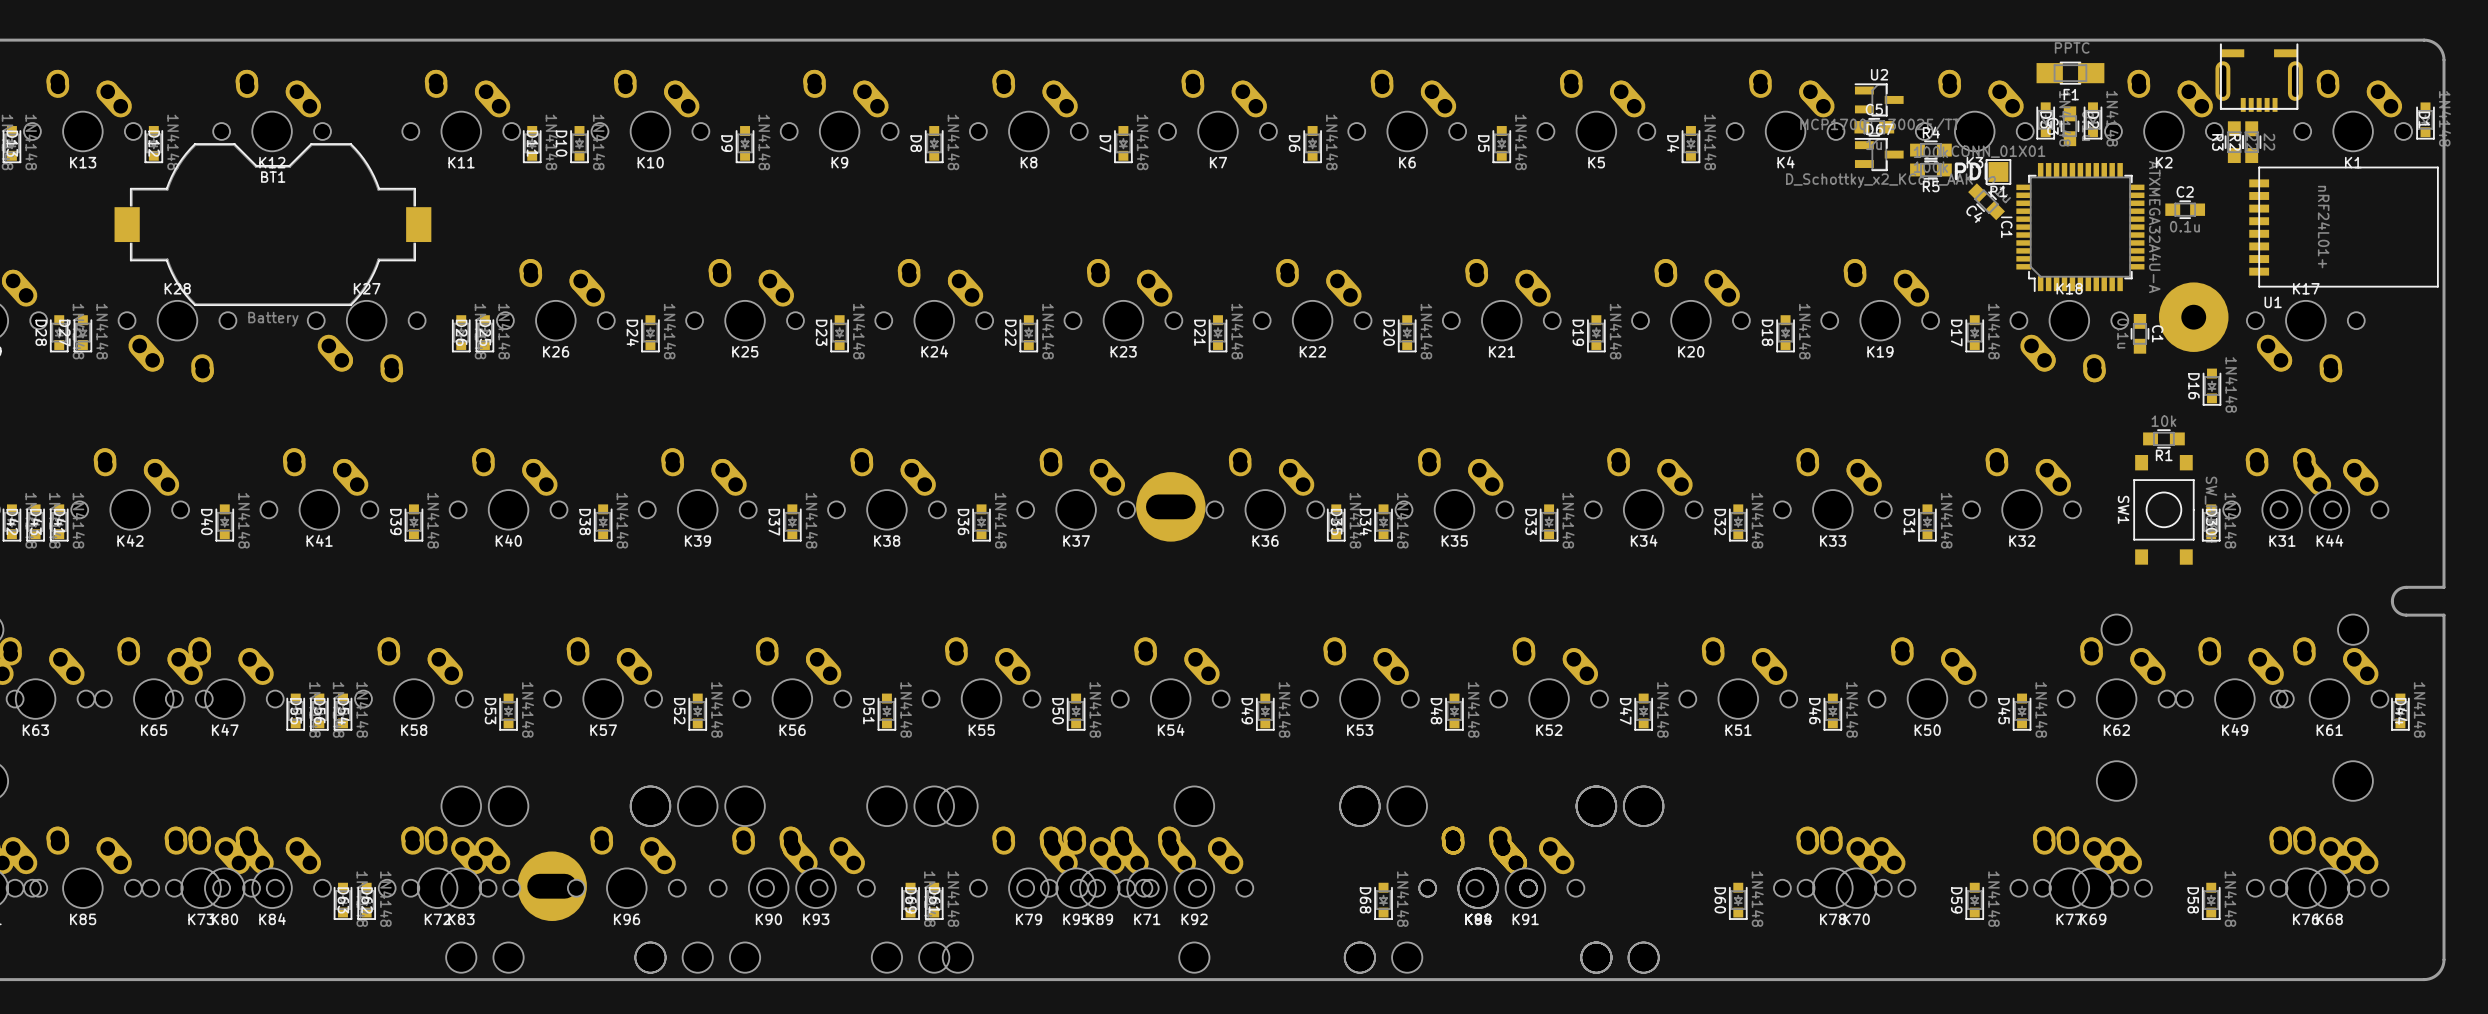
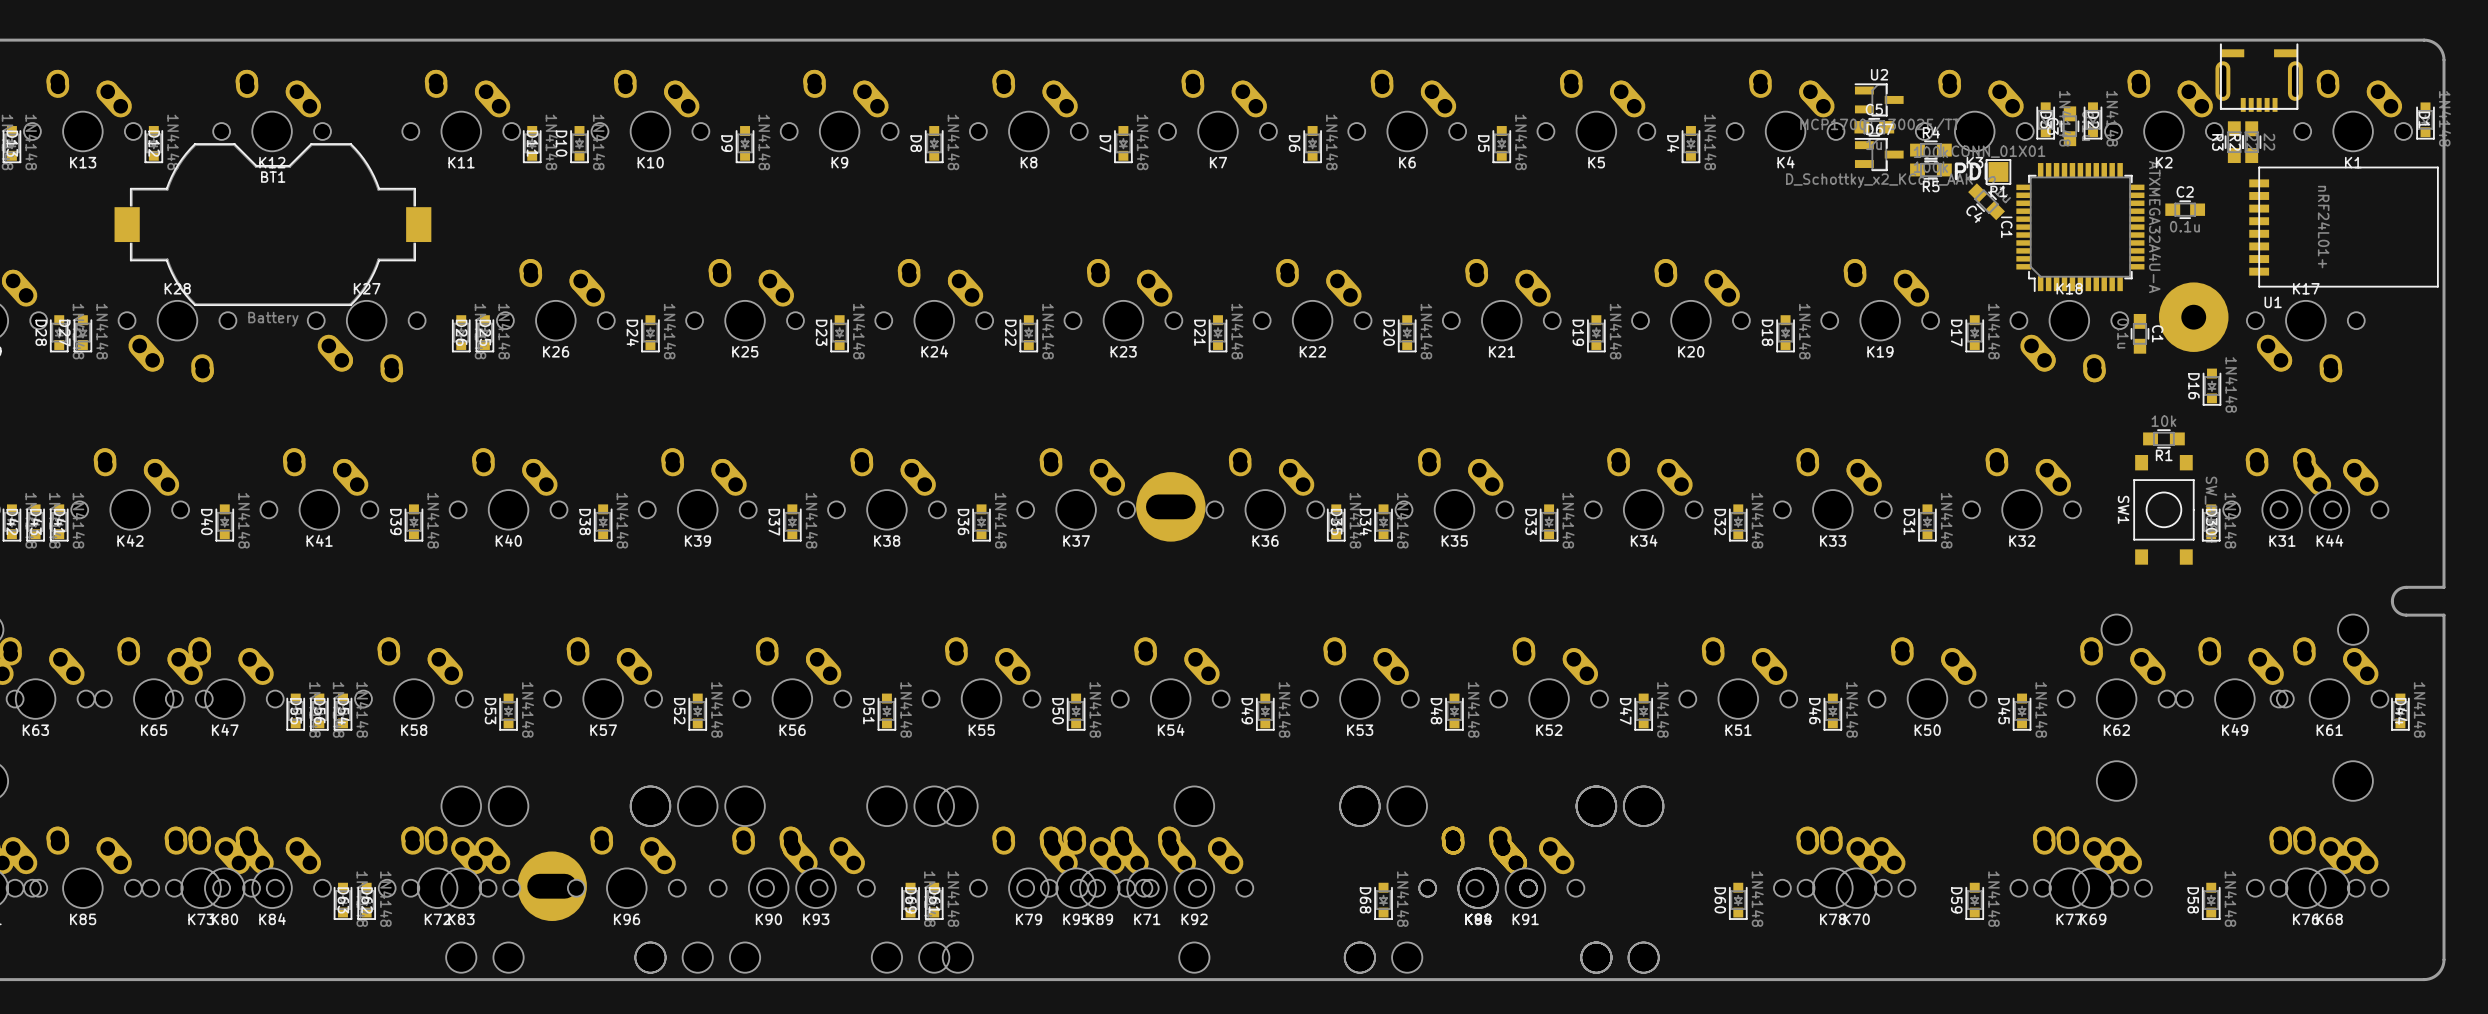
F1: PPTC (2070, 73) -> none

